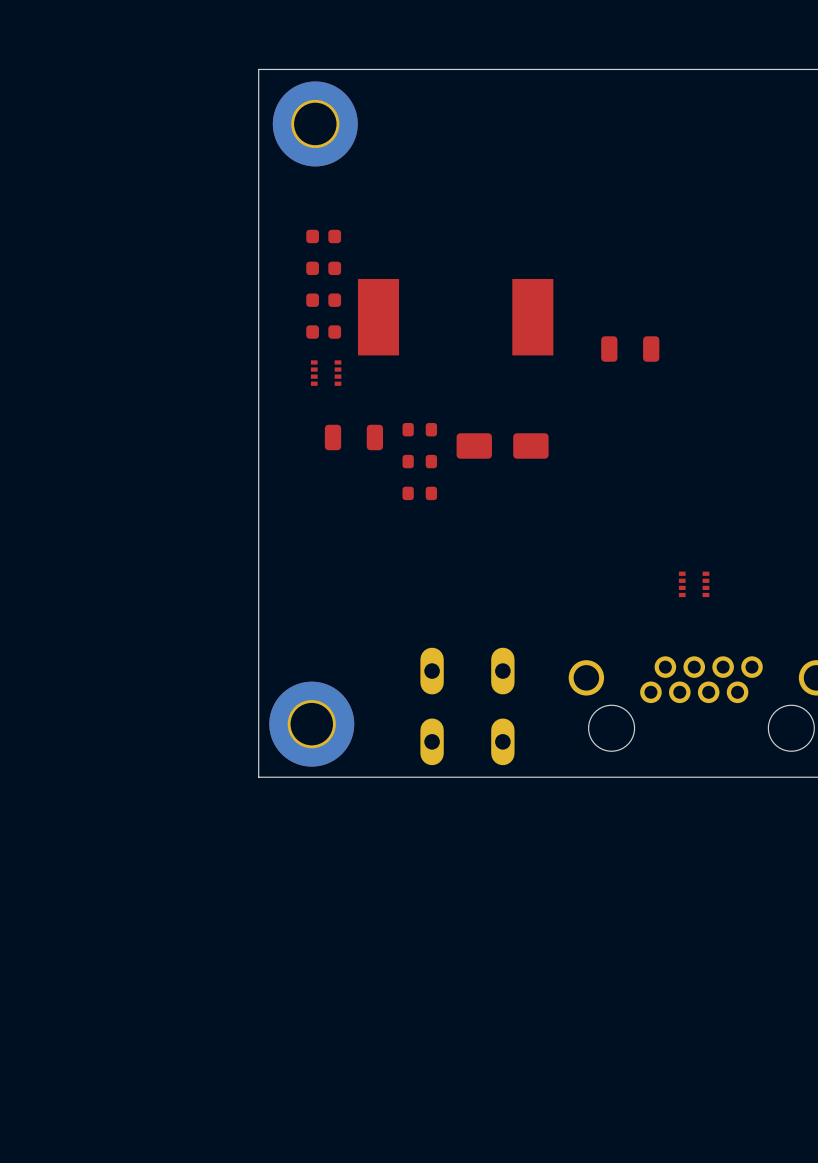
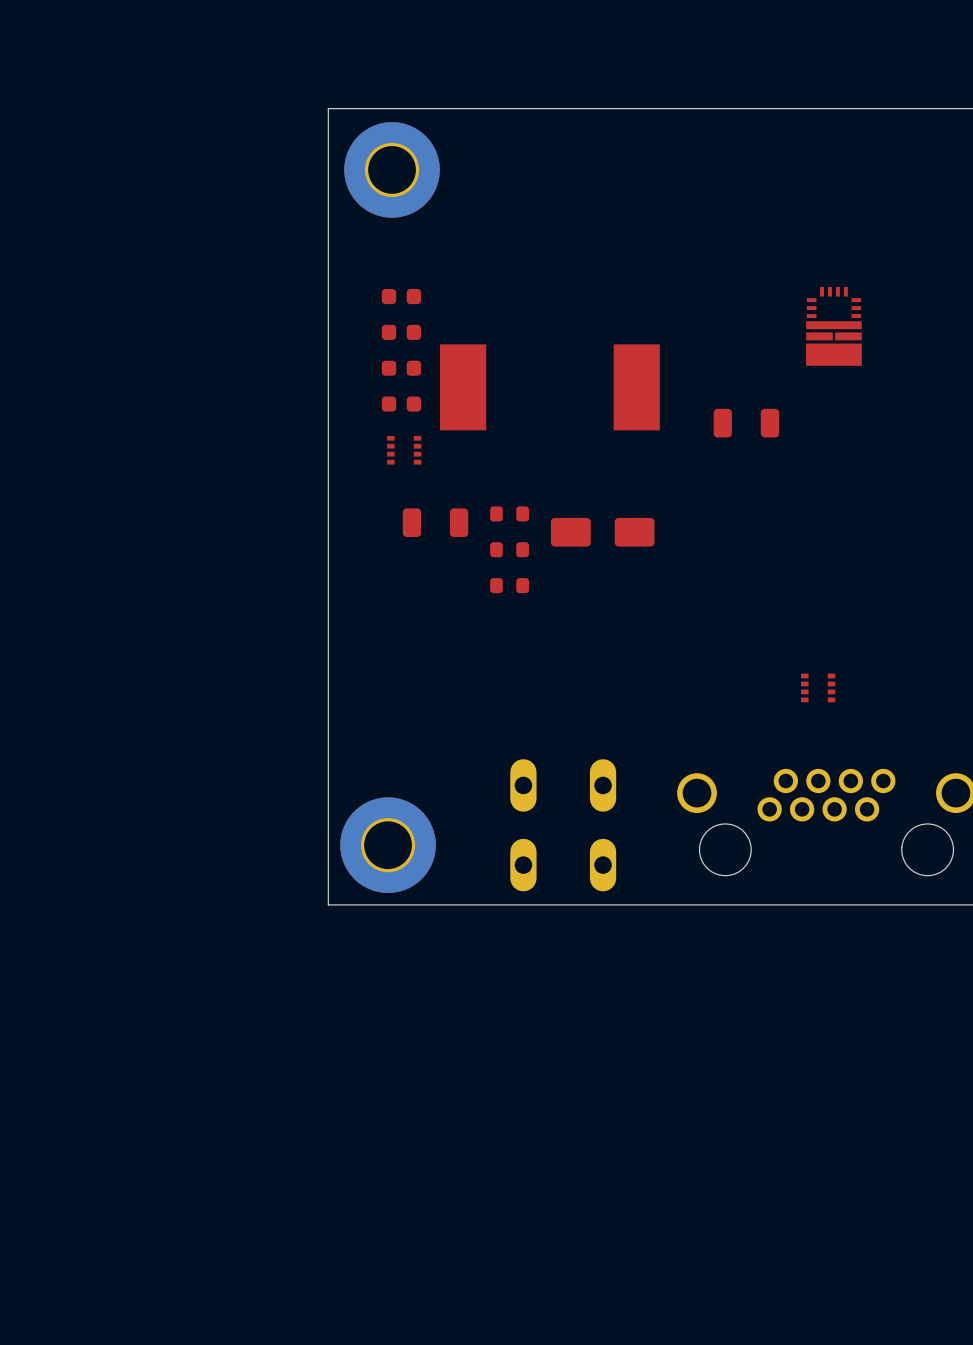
part: none -> (833, 326)

